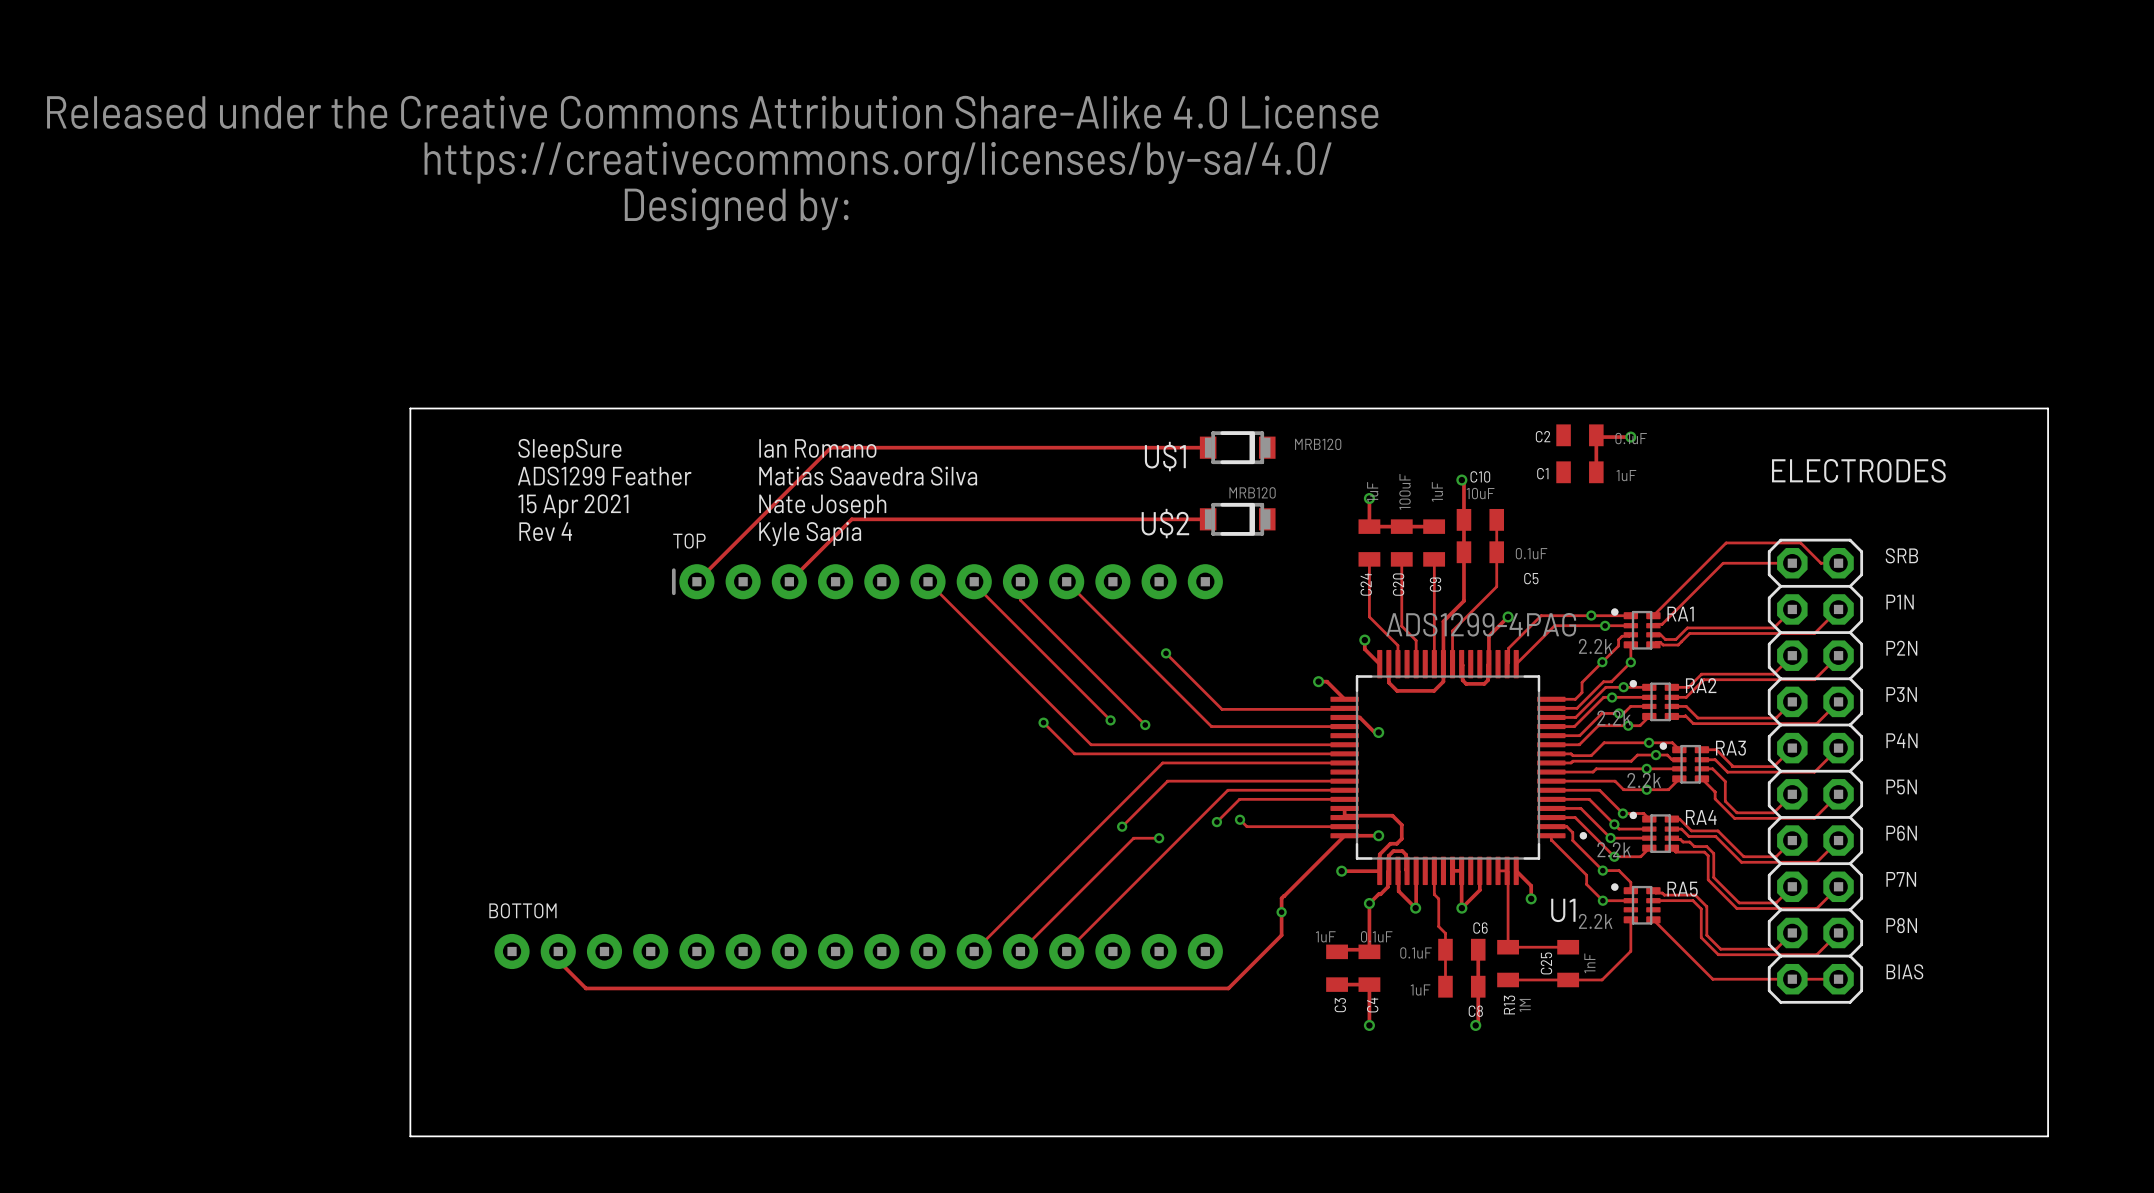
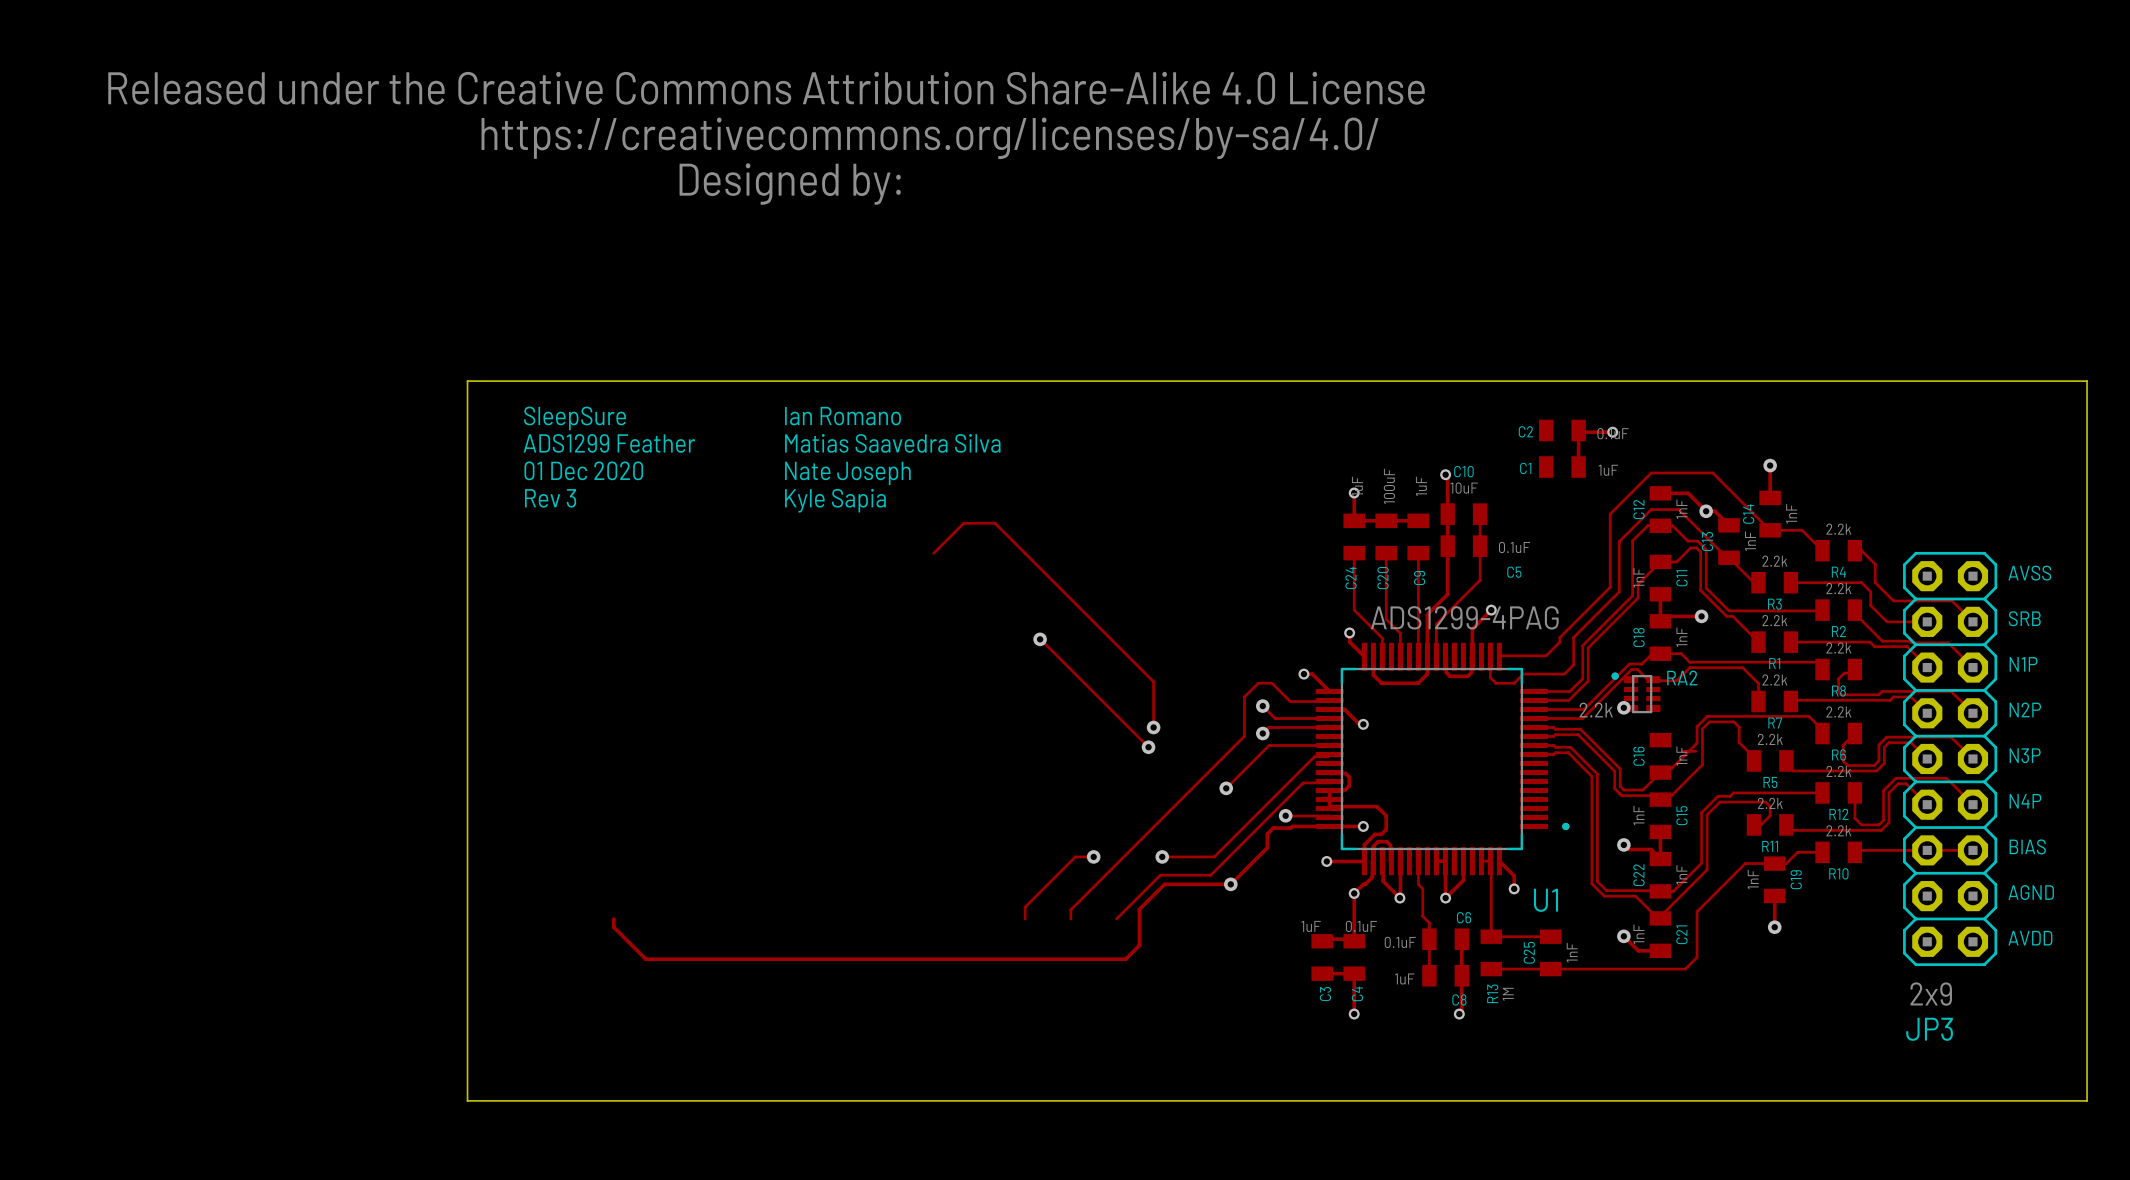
drawing position: (712, 162) -> (766, 138)
board edge: (410, 408) (2048, 408) (2048, 1136) (410, 1136) (410, 408) -> (467, 381) (2087, 381) (2087, 1100) (467, 1100) (467, 381)
track: (1208, 447) (830, 447) (696, 581) -> none
U$1: MRB120 (1237, 447) -> none
text position: Ian Romano (817, 448) -> Ian Romano (843, 416)
text position: SleepSure (569, 450) -> SleepSure (575, 418)
track: none -> (1770, 465) (1770, 497)
via: none -> (1770, 465)
text: none -> 01 Dec 2020 (583, 470)
text position: ADS1299 Feather (604, 476) -> ADS1299 Feather (609, 443)
text position: Matias Saavedra Silva (868, 476) -> Matias Saavedra Silva (892, 443)
track: none -> (1660, 493) (1688, 493) (1706, 511) (1714, 511) (1729, 525)
text: 15 Apr 2021 (573, 506) -> Rev 3 (550, 498)
text position: Nate Joseph (822, 506) -> Nate Joseph (847, 473)
C12: none -> 1nF (1660, 509)
via: none -> (1706, 511)
track: (1208, 519) (851, 519) (789, 581) -> none
U$2: MRB120 (1237, 519) -> none
C14: none -> 1nF (1770, 514)
text: Rev 4 (545, 531) -> none
text position: Kyle Sapia (810, 534) -> Kyle Sapia (835, 500)
C13: none -> 1nF (1729, 541)
R4: none -> 2.2k (1838, 550)
track: none -> (1854, 550) (1861, 550) (1875, 564) (1875, 582) (1893, 600) (1952, 600) (1972, 621)
track: none -> (933, 553) (963, 523) (995, 523) (1153, 681) (1153, 727)
track: (1792, 563) (1723, 563) (1662, 624) (1653, 625) -> none
track: (1838, 563) (1821, 563) (1800, 542) (1726, 542) (1653, 615) -> none
text: none -> AVSS (2029, 573)
track: (928, 581) (1091, 744) (1344, 744) -> none
TOP: (947, 581) -> none
track: (974, 581) (974, 584) (1110, 720) -> none
track: (1020, 581) (1020, 600) (1145, 725) -> none
track: (1066, 581) (1211, 726) (1289, 726) -> (1262, 706) (1275, 718)
C11: none -> 1nF (1660, 578)
R3: none -> 2.2k (1774, 582)
track: none -> (1790, 582) (1861, 582) (1870, 591) (1870, 605) (1887, 621) (1927, 621)
track: none -> (1660, 594) (1660, 621) (1665, 616) (1701, 616)
track: (1792, 609) (1773, 627) (1687, 627) (1675, 639) (1665, 639) (1660, 634) (1651, 636) -> none
track: (1838, 609) (1814, 633) (1689, 633) (1678, 645) (1663, 645) (1660, 642) (1653, 644) -> none
via: (1591, 615) -> none
track: (1630, 615) (1541, 615) (1508, 648) (1507, 664) -> (1758, 582) (1753, 582) (1678, 509) (1651, 509) (1619, 541) (1619, 591) (1573, 637) (1573, 664) (1564, 674) (1523, 674) (1514, 683) (1495, 683) (1490, 677) (1490, 656)
R2: none -> 2.2k (1838, 610)
track: none -> (1854, 610) (1854, 613) (1882, 641) (1948, 642) (1972, 667)
via: none -> (1701, 616)
via: (1605, 625) -> none
track: (1630, 625) (1554, 625) (1517, 663) -> (1822, 550) (1802, 530) (1770, 530) (1712, 472) (1651, 472) (1610, 514) (1610, 587) (1559, 637) (1559, 642) (1546, 655) (1500, 655)
text: none -> SRB (2024, 618)
RA1: 2.2k (1635, 629) -> none
track: (1630, 634) (1622, 636) (1618, 639) (1618, 645) (1582, 682) (1582, 692) (1575, 699) -> (1822, 610) (1729, 610) (1706, 588) (1706, 549) (1697, 541) (1687, 541) (1672, 525) (1647, 525) (1632, 540) (1632, 595) (1582, 645) (1582, 678) (1569, 691) (1557, 691)
track: (1630, 644) (1630, 662) (1611, 681) (1603, 681) (1576, 708) -> (1758, 642) (1732, 616) (1726, 616) (1700, 590) (1700, 551) (1696, 547) (1690, 547) (1676, 561) (1660, 561) (1638, 584) (1638, 597) (1588, 647) (1588, 680) (1568, 700) (1559, 700)
C18: none -> 1nF (1660, 637)
track: none -> (1040, 639) (1148, 747)
via: none -> (1040, 639)
R1: none -> 2.2k (1774, 642)
track: none -> (1790, 642) (1870, 642) (1874, 646) (1907, 646) (1927, 667)
track: (1166, 653) (1222, 709) (1304, 709) -> (1070, 918) (1070, 909) (1244, 736) (1244, 696) (1258, 683) (1271, 683) (1290, 701)
via: (1166, 653) -> none
track: (1792, 655) (1773, 674) (1701, 674) (1688, 687) (1671, 687) -> none
track: (1838, 655) (1814, 679) (1703, 679) (1686, 697) (1671, 697) -> none
via: (1602, 662) -> none
via: (1630, 662) -> none
text: none -> N1P (2023, 664)
R8: none -> 2.2k (1838, 669)
track: none -> (1854, 669) (1854, 673) (1844, 673) (1838, 678) (1838, 692) (1841, 694) (1878, 694) (1882, 691) (1951, 691) (1972, 713)
via: (1623, 687) -> none
track: (1649, 687) (1605, 687) (1575, 717) -> (1822, 669) (1822, 665) (1818, 662) (1689, 662) (1681, 653) (1652, 653) (1641, 664) (1629, 664) (1583, 709) (1558, 709)
via: (1612, 697) -> none
track: (1649, 697) (1603, 697) (1574, 726) -> (1758, 701) (1758, 683) (1742, 667) (1689, 667) (1676, 680) (1648, 680) (1637, 669) (1631, 669) (1582, 718) (1556, 718)
track: (1792, 701) (1776, 718) (1697, 718) (1686, 706) (1671, 706) -> none
track: (1838, 701) (1816, 723) (1693, 723) (1685, 715) (1671, 716) -> none
track: (1649, 706) (1630, 706) (1623, 713) (1601, 713) (1579, 735) (1571, 735) -> (1822, 733) (1822, 729) (1809, 716) (1707, 716) (1697, 726) (1697, 743) (1667, 772) (1660, 772) (1642, 790) (1623, 790) (1620, 786) (1620, 769) (1580, 729) (1555, 729) (1553, 727)
R7: none -> 2.2k (1774, 701)
track: none -> (1790, 701) (1890, 700) (1893, 696) (1910, 696) (1927, 713)
via: (1619, 713) -> none
via: none -> (1262, 706)
via: none -> (1623, 707)
track: (1649, 716) (1640, 725) (1598, 725) (1579, 744) (1571, 744) -> (1665, 799) (1661, 795) (1621, 795) (1614, 788) (1614, 771) (1578, 734) (1555, 734) (1553, 736)
text: none -> N2P (2025, 709)
via: (1110, 720) -> none
track: (1043, 722) (1074, 753) (1283, 753) -> (1226, 788) (1269, 745)
via: (1043, 722) -> none
via: (1145, 725) -> none
via: (1628, 725) -> none
via: none -> (1153, 727)
track: none -> (1329, 727) (1268, 727) (1262, 733)
via: none -> (1262, 733)
R6: none -> 2.2k (1838, 733)
track: none -> (1854, 733) (1843, 745) (1843, 760) (1847, 765) (1874, 765) (1878, 760) (1878, 744) (1886, 737) (1951, 737) (1972, 758)
via: (1649, 742) -> none
track: (1792, 748) (1773, 766) (1732, 766) (1716, 749) (1701, 749) -> none
track: (1838, 748) (1814, 772) (1727, 772) (1715, 759) -> none
track: (1679, 749) (1672, 742) (1604, 742) (1591, 755) (1588, 755) -> (1822, 792) (1733, 792) (1730, 796) (1717, 796) (1701, 812) (1701, 863) (1673, 891) (1606, 890) (1597, 881) (1597, 774) (1570, 747)
via: none -> (1148, 747)
via: (1655, 755) -> none
track: (1679, 759) (1672, 759) (1667, 755) (1637, 755) (1631, 761) (1585, 761) -> (1753, 824) (1761, 824) (1770, 815) (1770, 806) (1765, 802) (1719, 802) (1707, 814) (1707, 869) (1660, 918) (1657, 918) (1635, 896) (1604, 896) (1591, 883) (1591, 776) (1568, 752)
track: (1344, 762) (1162, 762) (974, 951) -> (1329, 754) (1327, 756) (1314, 756) (1214, 856) (1162, 856)
RA3: 2.2k (1684, 763) -> none
C16: none -> 1nF (1660, 756)
text: none -> N3P (2025, 755)
track: none -> (1927, 758) (1910, 742) (1888, 742) (1884, 747) (1884, 763) (1876, 770) (1792, 770) (1786, 764) (1786, 760)
JP3: none -> 2x9 (1950, 758)
via: (1646, 768) -> none
track: (1679, 768) (1596, 768) (1593, 772) (1551, 772) -> none
track: (1701, 768) (1712, 768) (1725, 781) (1725, 801) (1736, 812) (1773, 812) (1792, 794) -> none
track: none -> (1753, 760) (1753, 757) (1739, 742) (1739, 727) (1733, 721) (1709, 721) (1702, 728) (1702, 764) (1667, 799) (1655, 799) (1651, 795)
R5: none -> 2.2k (1770, 760)
ELECTRODES: (1815, 771) -> none
track: (1679, 778) (1668, 789) (1623, 789) (1615, 781) (1551, 781) -> none
track: (1701, 778) (1715, 792) -> none
track: (1344, 781) (1167, 781) (1122, 826) -> (1329, 772) (1345, 773) (1349, 777) (1349, 785) (1345, 789) (1329, 790) (1329, 799)
via: (1646, 789) -> none
track: (1344, 790) (1227, 790) (1066, 951) -> (1329, 781) (1303, 782) (1210, 875) (1160, 875) (1116, 918)
track: (1551, 790) (1599, 790) (1622, 813) (1643, 813) (1649, 819) -> none
track: (1715, 792) (1715, 798) (1734, 818) (1814, 818) (1838, 794) -> none
via: none -> (1226, 788)
track: (1344, 799) (1239, 799) (1216, 822) -> none
track: (1551, 799) (1589, 799) (1619, 829) (1649, 829) -> none
R12: none -> 2.2k (1838, 792)
track: none -> (1854, 792) (1854, 818) (1861, 824) (1878, 824) (1883, 820) (1883, 790) (1895, 778) (1946, 778) (1972, 804)
track: (1551, 808) (1580, 808) (1610, 838) (1649, 838) -> none
text: none -> N4P (2025, 801)
via: (1622, 813) -> none
track: none -> (1927, 804) (1906, 783) (1898, 783) (1888, 792) (1888, 822) (1881, 830) (1791, 830) (1786, 824)
track: (1551, 817) (1575, 817) (1614, 856) (1640, 856) (1649, 848) -> none
track: (1240, 819) (1246, 826) (1344, 826) -> (1285, 816) (1329, 817)
via: (1240, 819) -> none
track: (1671, 819) (1679, 819) (1691, 830) (1718, 830) (1743, 856) (1776, 856) (1792, 840) -> none
via: (1216, 822) -> none
via: none -> (1285, 815)
via: (1614, 824) -> none
C15: none -> 1nF (1660, 815)
via: (1122, 826) -> none
track: (1551, 826) (1566, 826) (1572, 832) (1572, 840) (1602, 870) (1619, 870) (1630, 882) (1630, 890) -> none
track: (1671, 829) (1681, 829) (1688, 836) (1715, 836) (1741, 862) (1816, 862) (1838, 840) -> none
RA4: 2.2k (1654, 832) -> none
R11: none -> 2.2k (1770, 824)
track: (1344, 835) (1281, 898) (1281, 935) (1228, 988) (586, 988) (558, 960) (558, 951) -> (1329, 826) (1273, 828) (1267, 834) (1267, 847) (1230, 884) (1164, 884) (1139, 909) (1139, 945) (1125, 959) (645, 959) (613, 927) (613, 918)
track: (1551, 835) (1551, 840) (1586, 875) (1586, 884) (1602, 900) (1630, 900) -> none
track: (1159, 838) (1133, 838) (1020, 951) -> none
via: (1159, 838) -> none
via: (1610, 838) -> none
track: (1671, 838) (1689, 842) (1694, 846) (1706, 846) (1713, 853) (1713, 877) (1739, 902) (1776, 902) (1792, 886) -> none
track: none -> (1660, 831) (1660, 859) (1650, 849) (1628, 849) (1623, 844)
track: (1671, 848) (1675, 852) (1704, 852) (1708, 855) (1708, 879) (1736, 908) (1816, 908) (1838, 886) -> none
via: none -> (1623, 844)
via: (1614, 856) -> none
text: none -> BIAS (2027, 846)
track: none -> (1972, 850) (1856, 850) (1854, 852)
R10: none -> 2.2k (1838, 852)
track: none -> (1093, 856) (1075, 856) (1025, 907) (1025, 918)
via: none -> (1093, 856)
via: none -> (1162, 856)
via: (1602, 870) -> none
C22: none -> 1nF (1660, 875)
C19: none -> 1nF (1774, 879)
track: (1653, 890) (1664, 895) (1695, 895) (1706, 906) (1706, 935) (1720, 949) (1776, 949) (1792, 932) -> none
via: none -> (1230, 884)
via: (1602, 900) -> none
track: (1653, 900) (1692, 900) (1701, 908) (1701, 937) (1718, 954) (1816, 954) (1838, 932) -> none
text: none -> AGND (2031, 892)
RA5: 2.2k (1635, 904) -> none
track: none -> (1774, 895) (1774, 927)
via: (1281, 912) -> none
track: (1630, 919) (1630, 951) (1602, 979) -> (1822, 852) (1797, 852) (1786, 863) (1745, 863) (1697, 911) (1697, 957) (1685, 969) (1584, 969)
track: (1653, 919) (1712, 979) (1838, 979) -> none
via: none -> (1774, 927)
C21: none -> 1nF (1660, 934)
track: none -> (1623, 936) (1638, 950) (1660, 950)
via: none -> (1623, 936)
text: none -> AVDD (2030, 938)
BOTTOM: (858, 951) -> none

